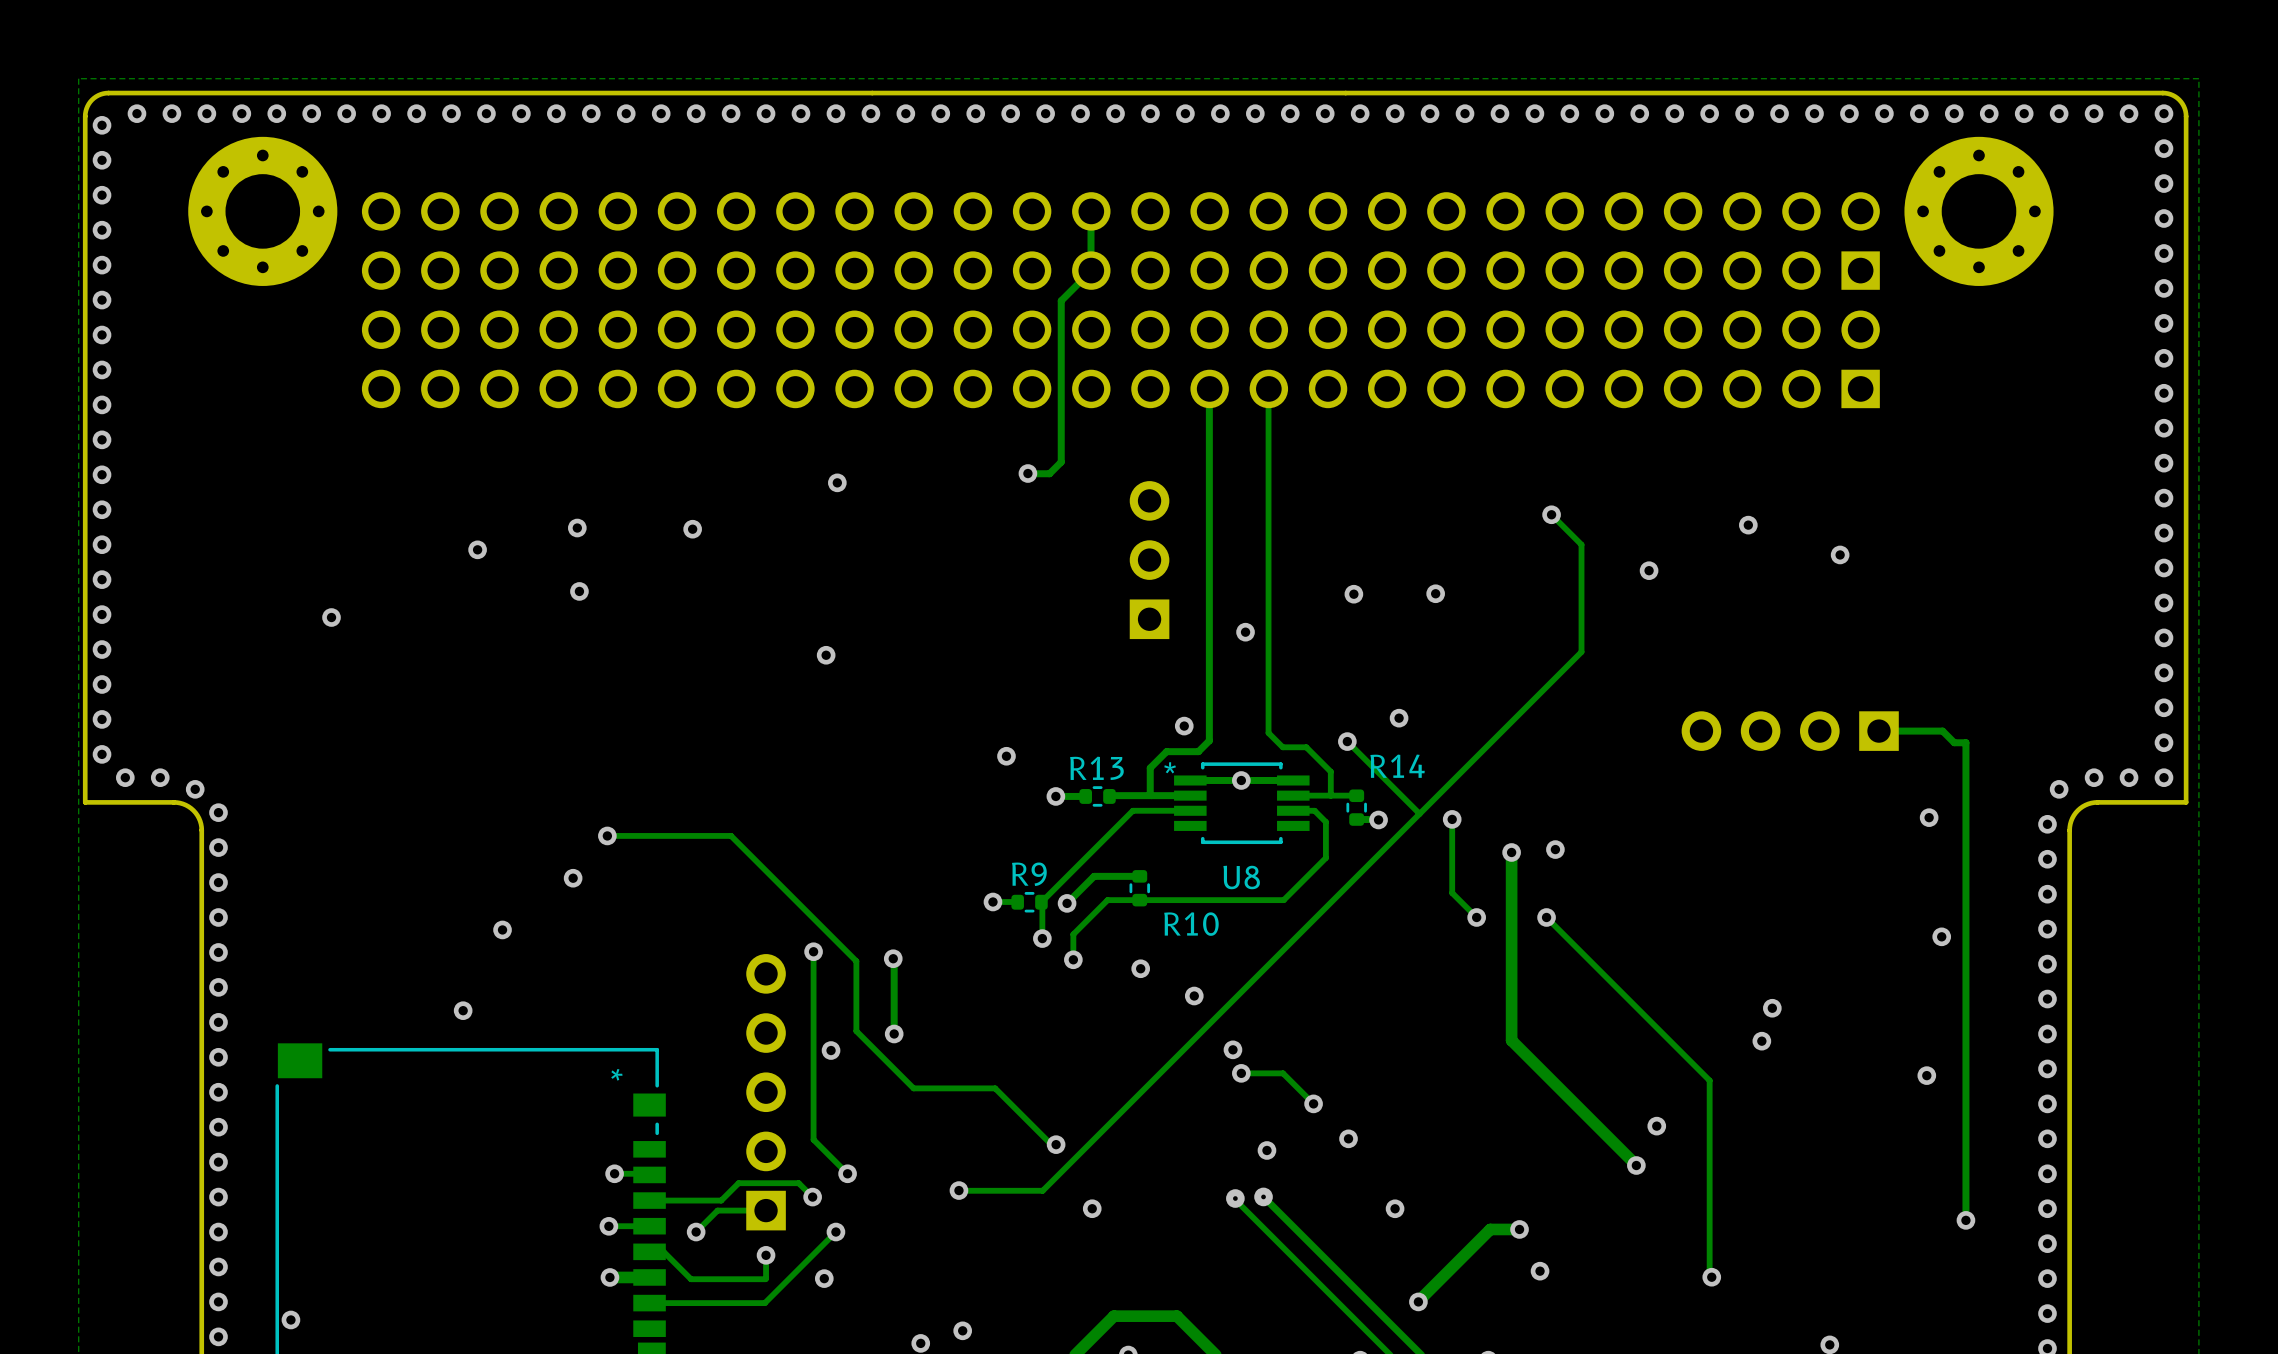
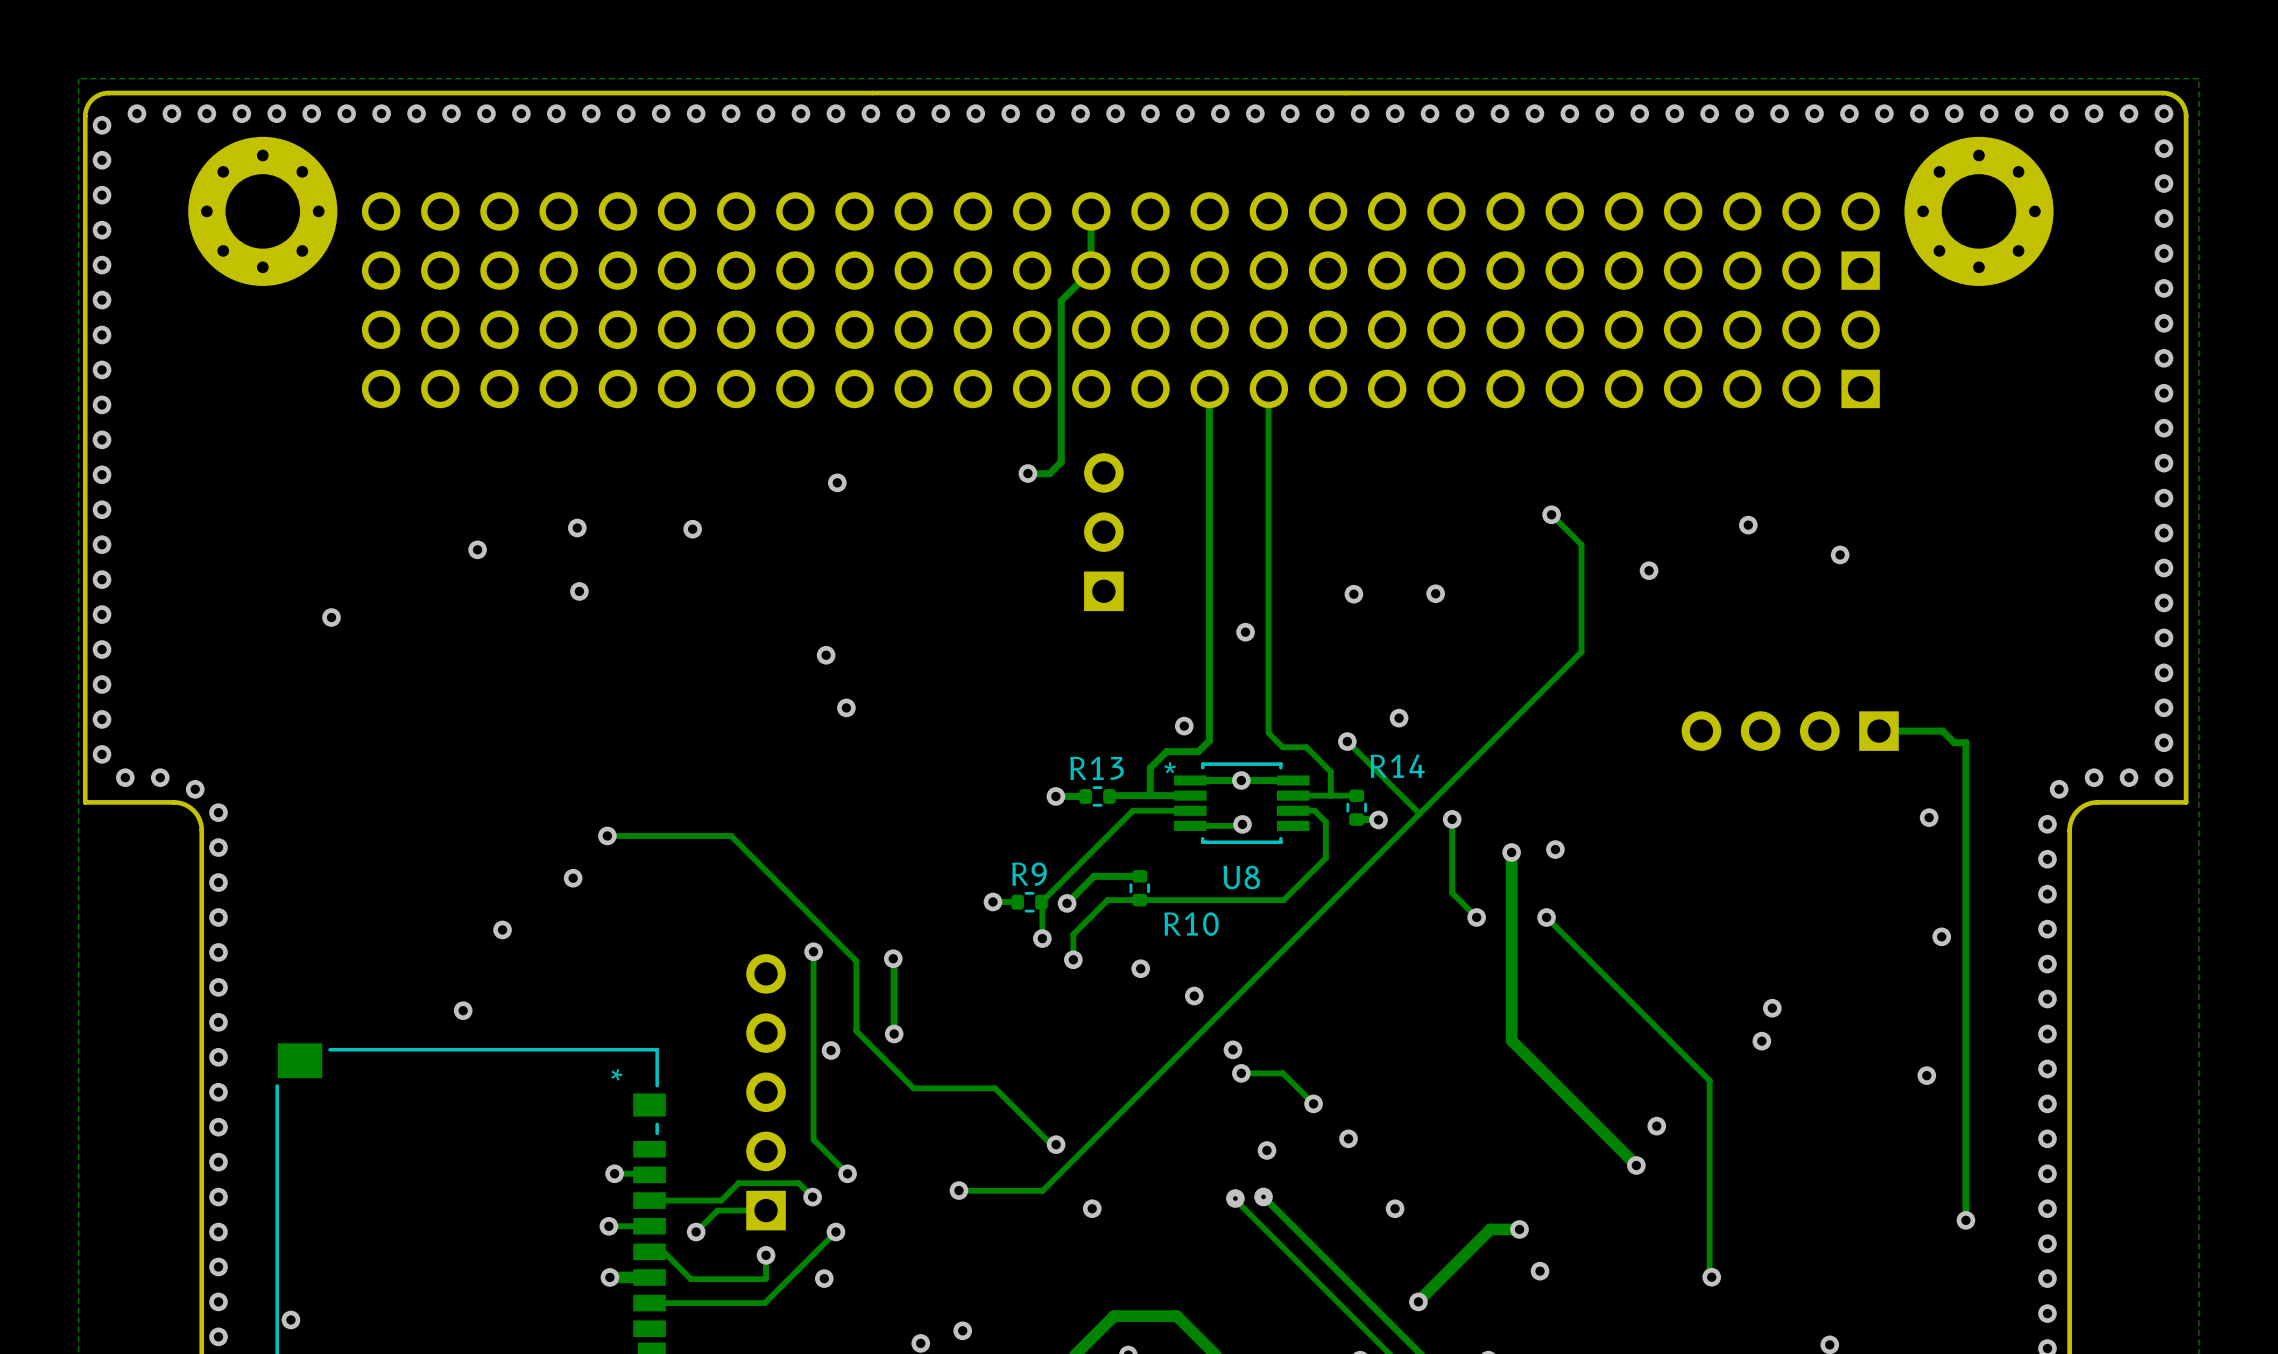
part position: (1149, 560) -> (1103, 532)
via: none -> (846, 707)
via: (1006, 756) -> none
track: none -> (1242, 824) (1190, 825)
via: none -> (1242, 824)

